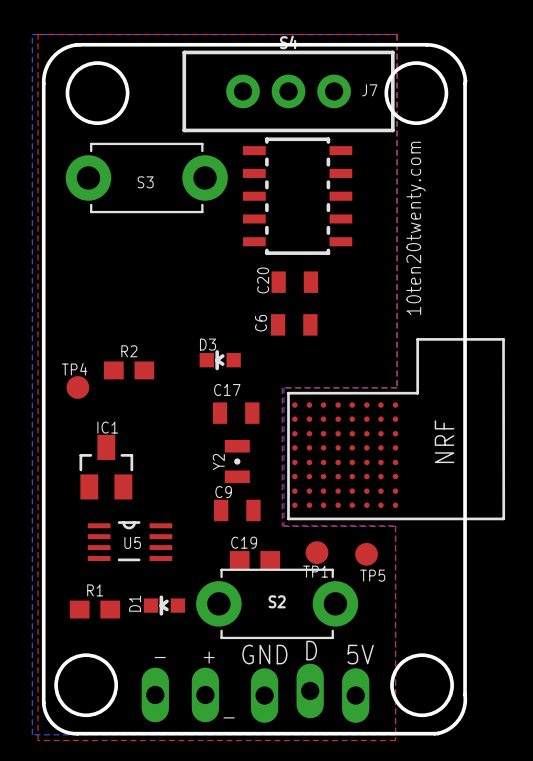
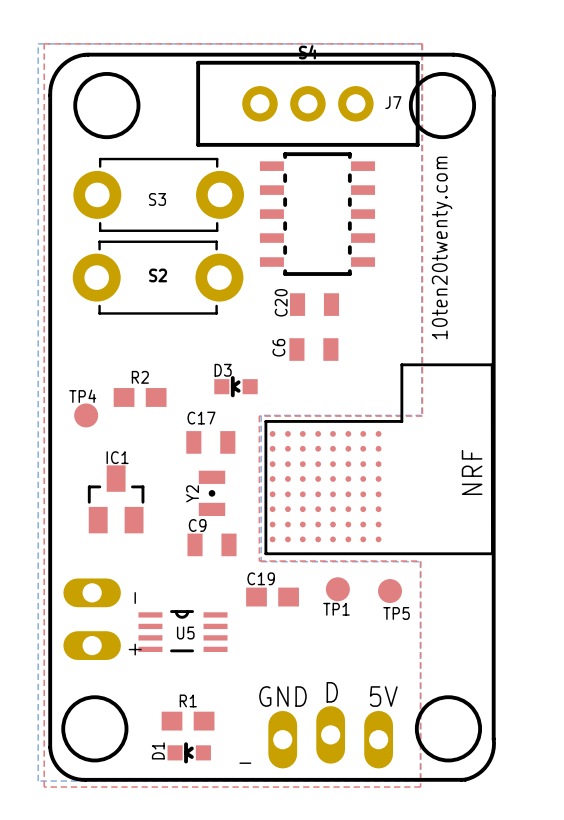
bottom zone outline: (283, 387) (283, 526) -> (303, 415) (261, 415) (261, 561) (303, 561)
top zone outline: (282, 388) (282, 525) -> (301, 416) (259, 416) (259, 561) (301, 561)
C17 position: (236, 413) -> (210, 442)
part position: (396, 429) -> (379, 459)
Y2 position: (237, 461) -> (212, 493)
C9 position: (237, 510) -> (212, 544)
U5 position: (130, 541) -> (182, 631)
S2 position: (277, 603) -> (158, 277)
D1 position: (164, 605) -> (189, 752)
R1 position: (94, 609) -> (188, 721)
text rotation: 0° (160, 657) -> 90° counterclockwise (135, 598)
text position: - (160, 657) -> - (135, 598)
text rotation: 0° (209, 657) -> 90° counterclockwise (135, 649)
text position: + (209, 657) -> + (135, 649)
part rotation: 0° (180, 694) -> 90° clockwise (92, 619)
part position: (180, 694) -> (92, 619)

